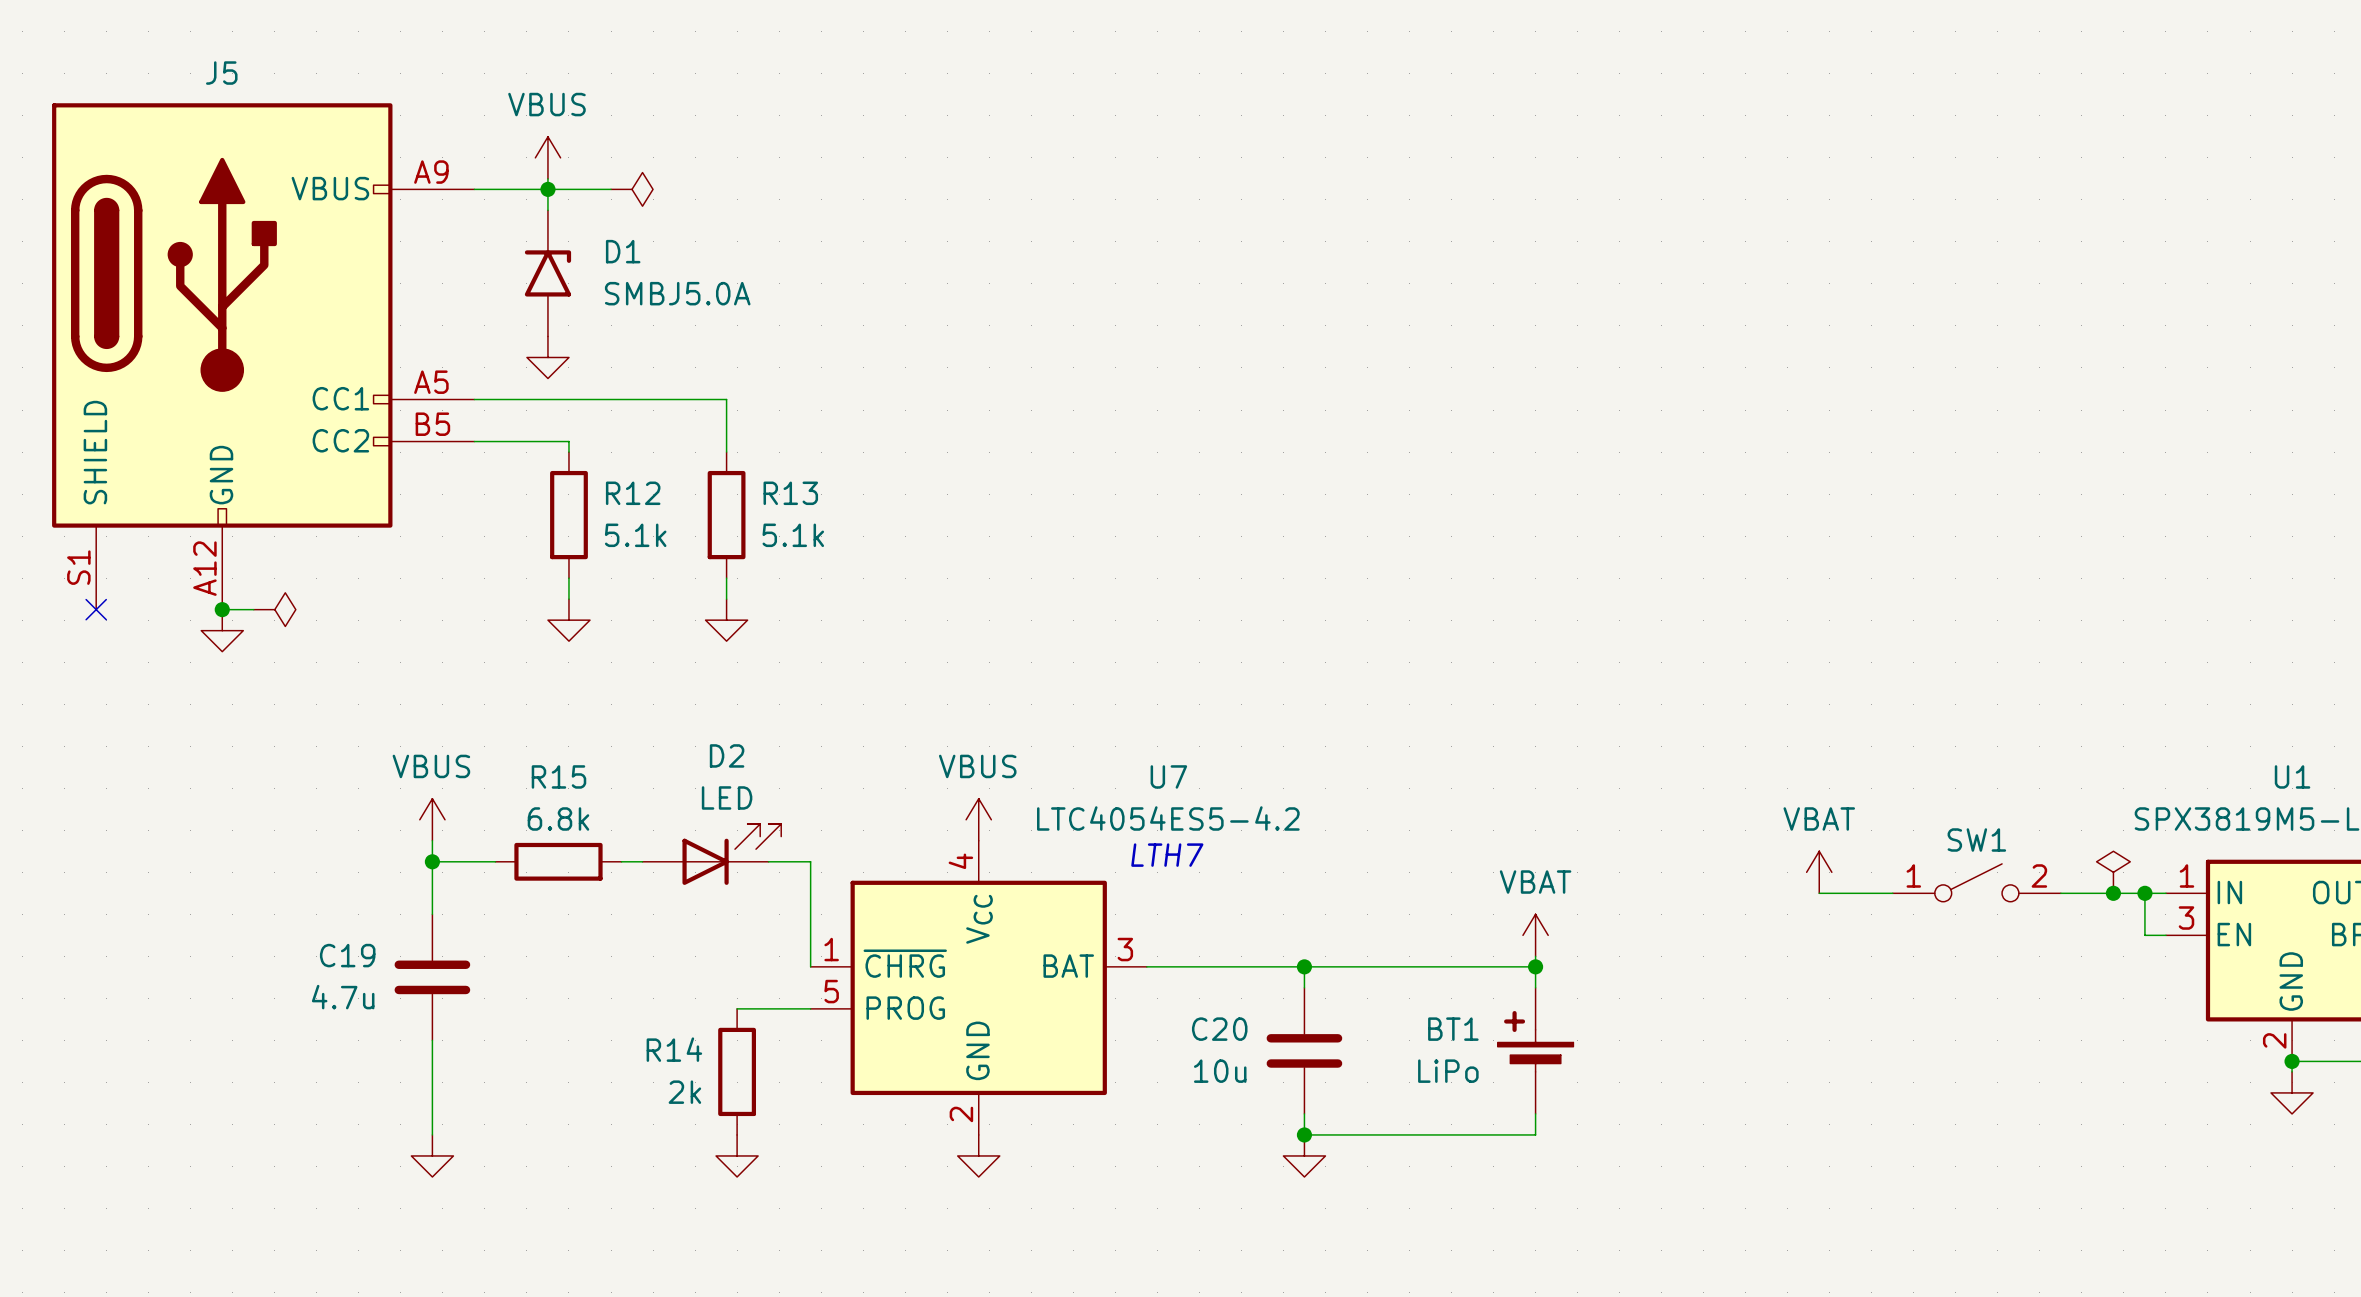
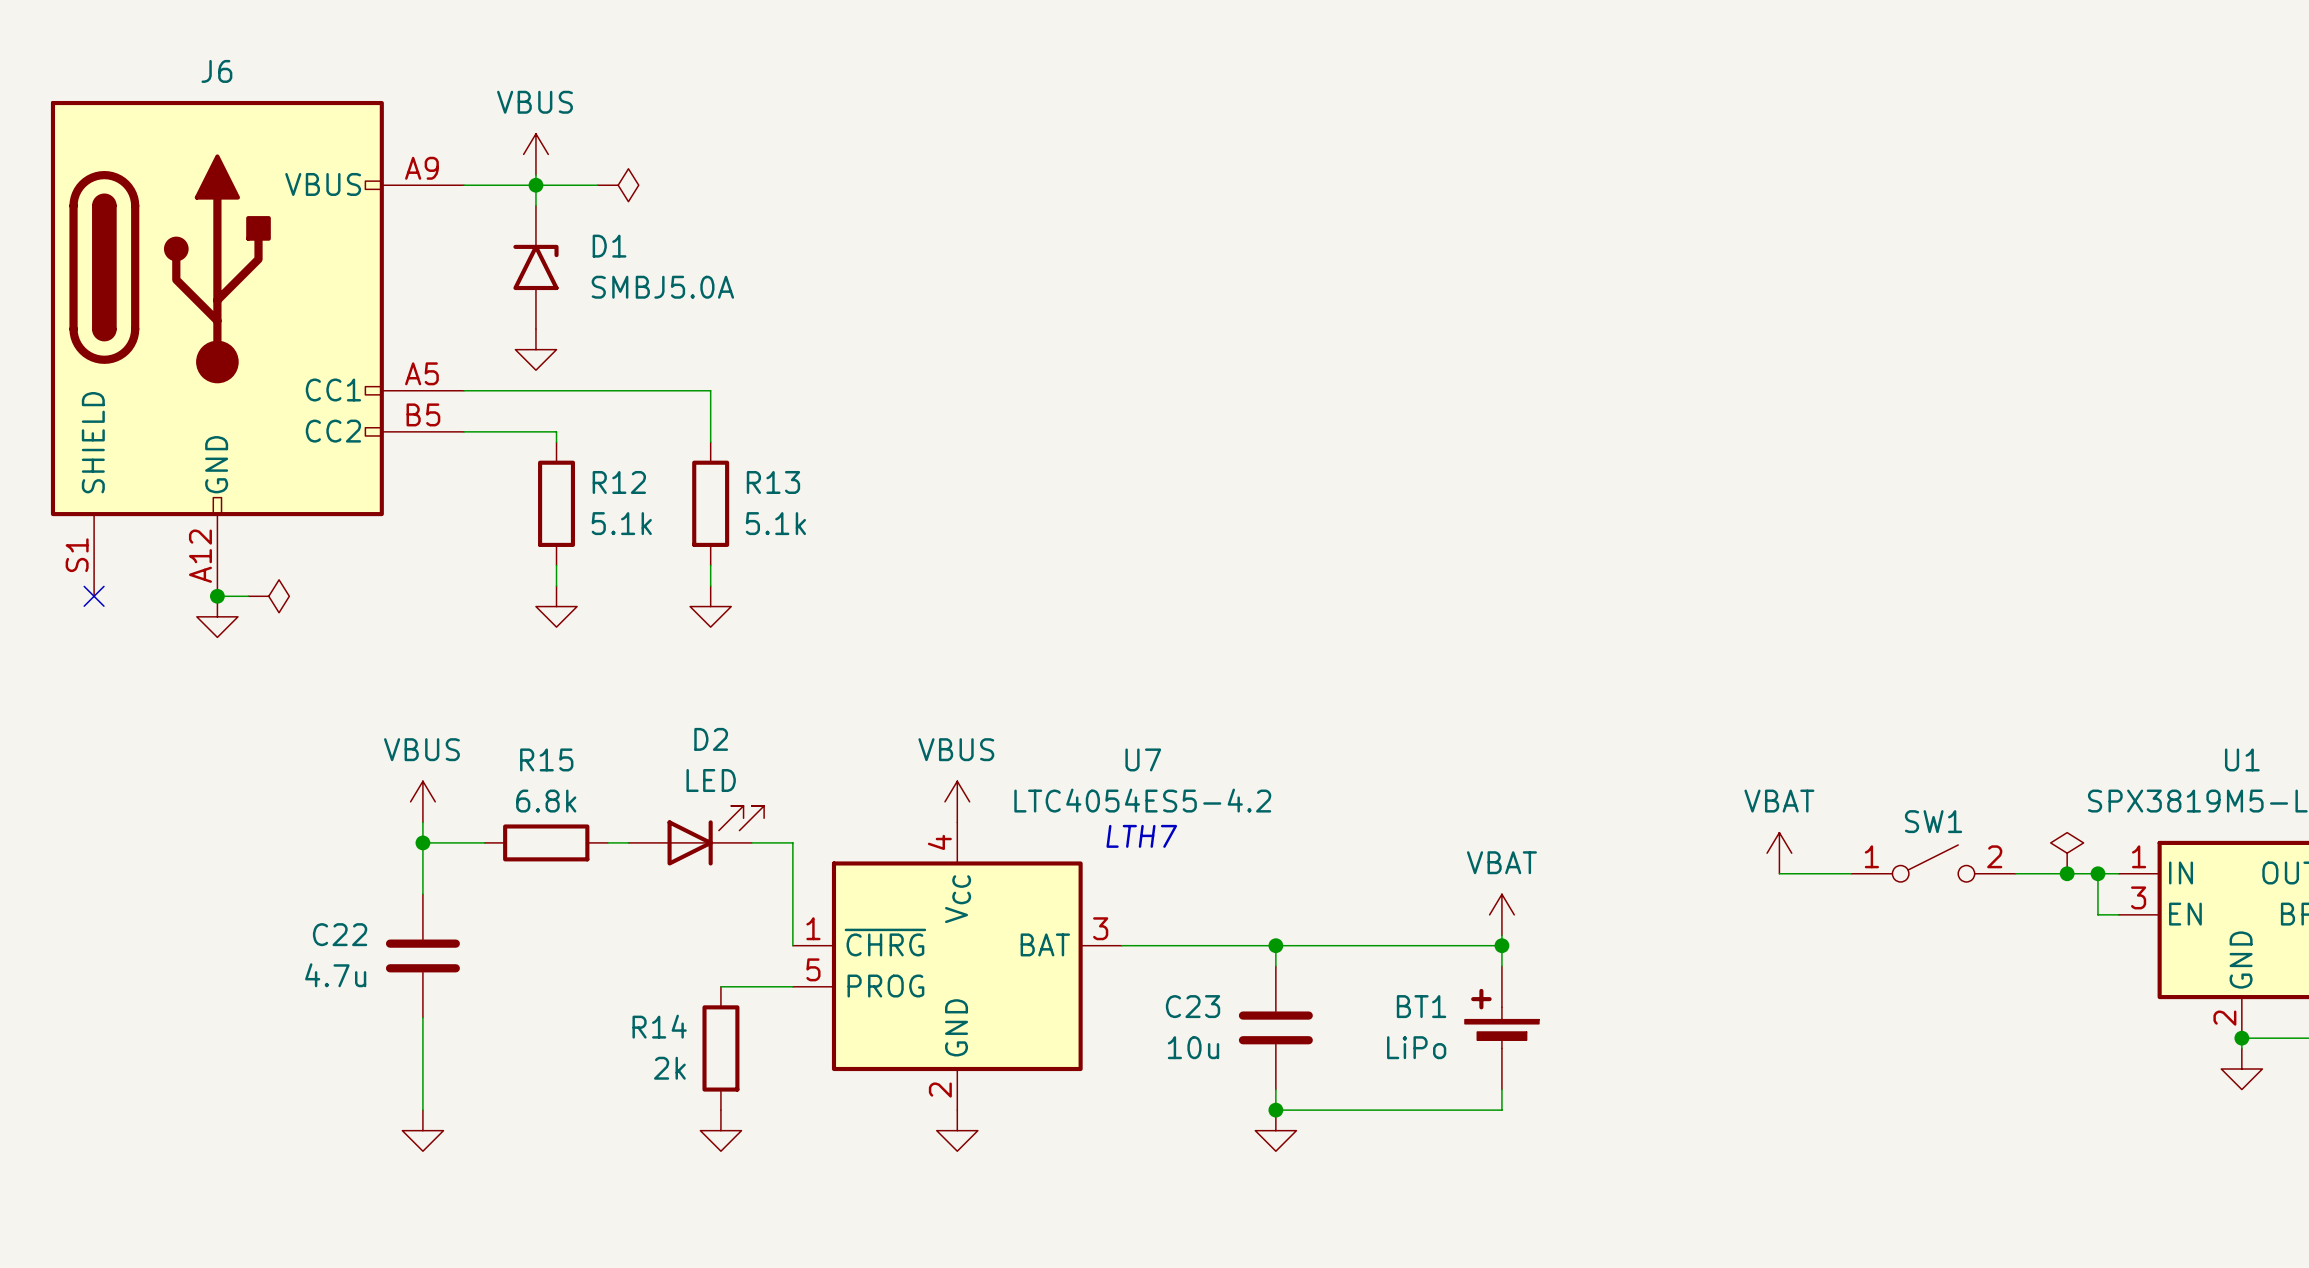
J5 name: J5 (221, 73) -> J6 (216, 71)
C19 name: C19 (347, 955) -> C22 (340, 934)
C20 name: C20 (1219, 1029) -> C23 (1193, 1006)

